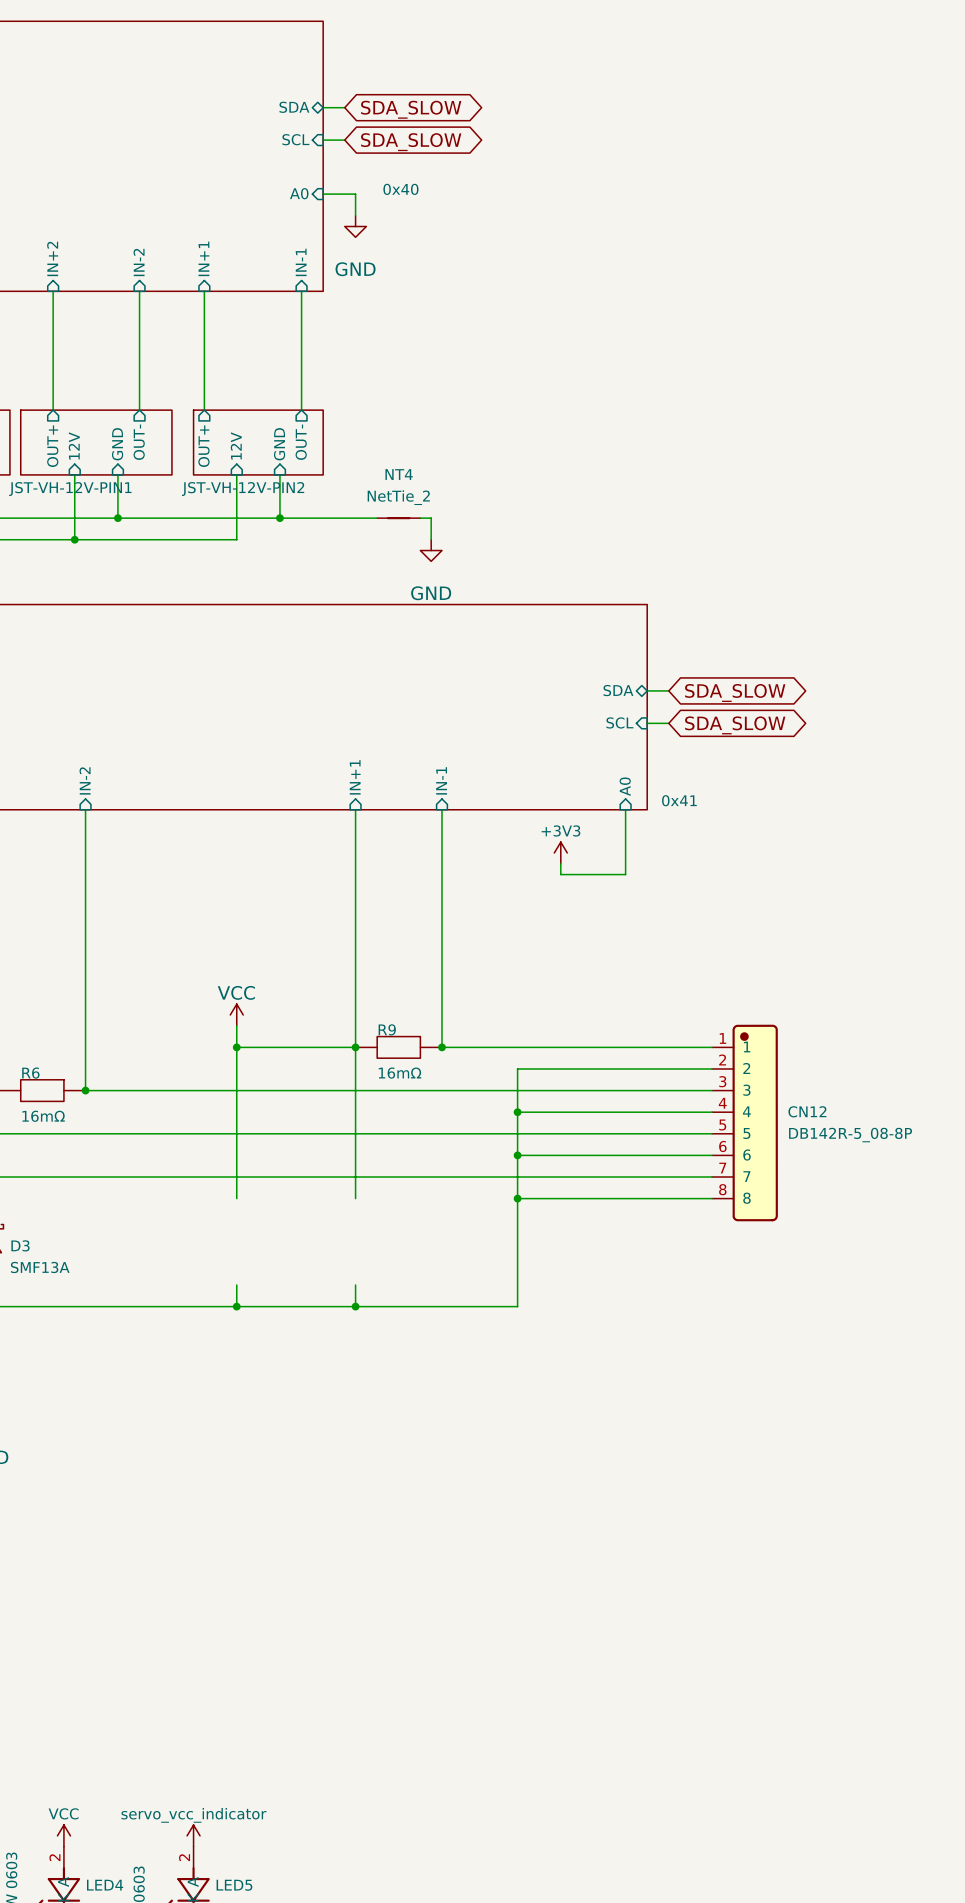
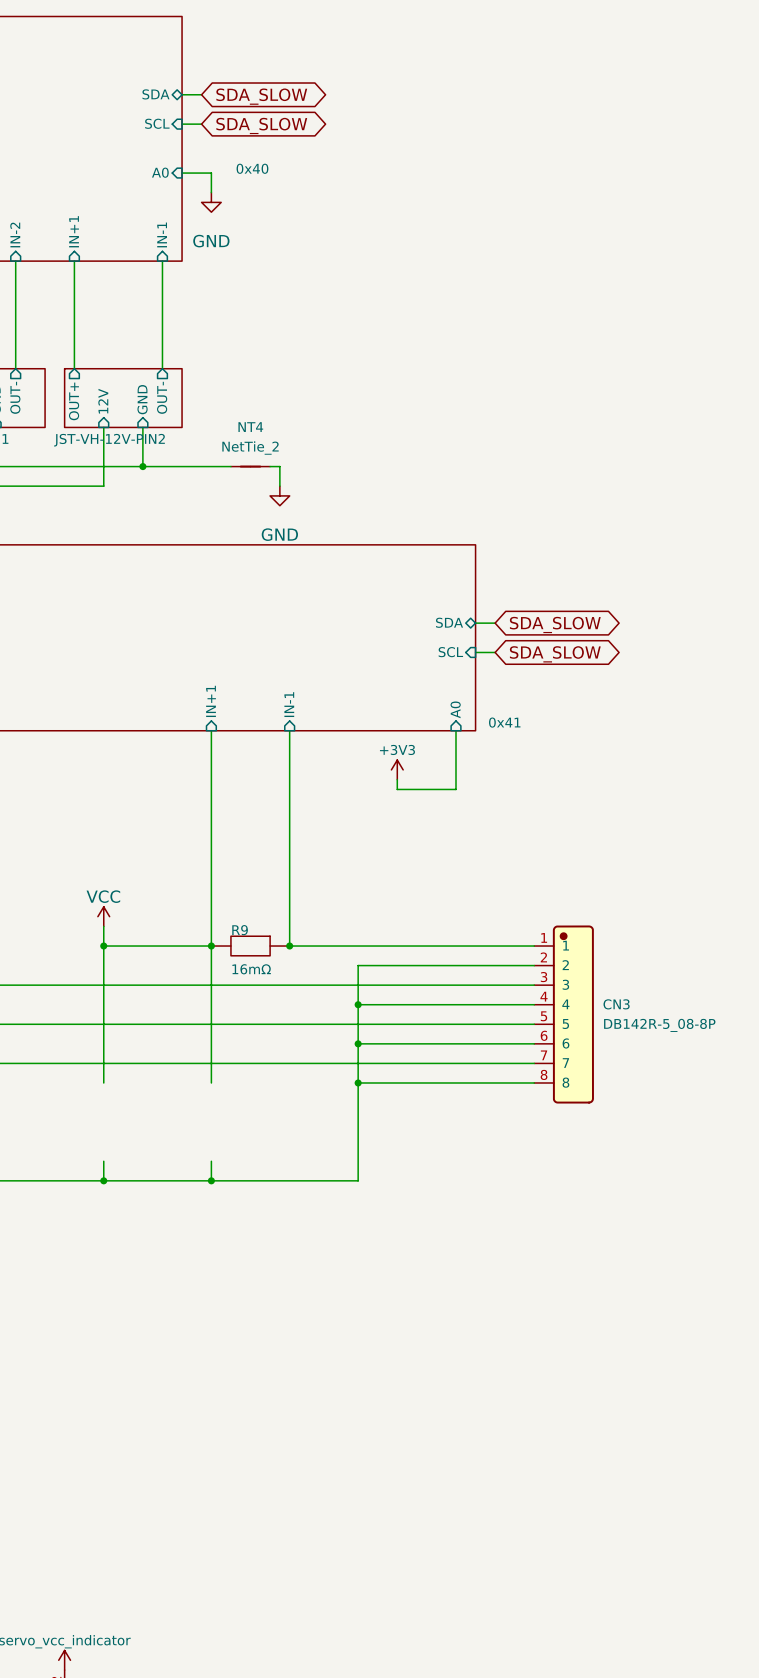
CN12 name: CN12 (807, 1111) -> CN3 (616, 1004)

